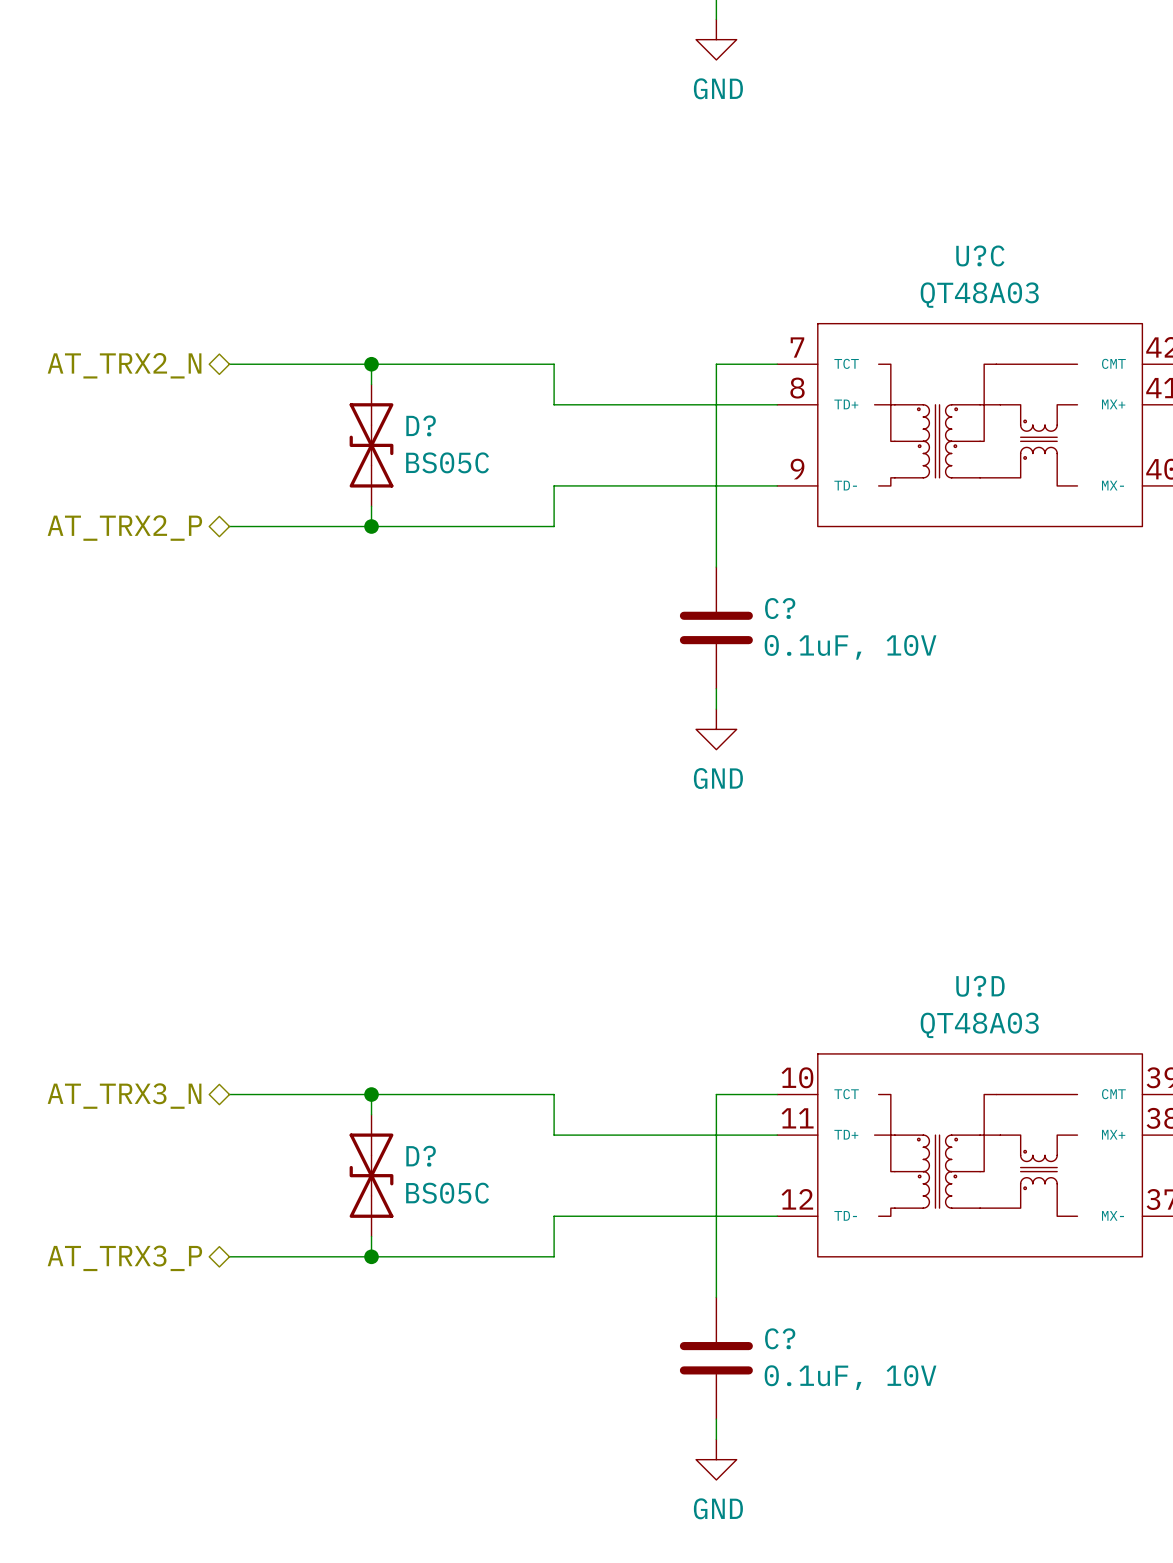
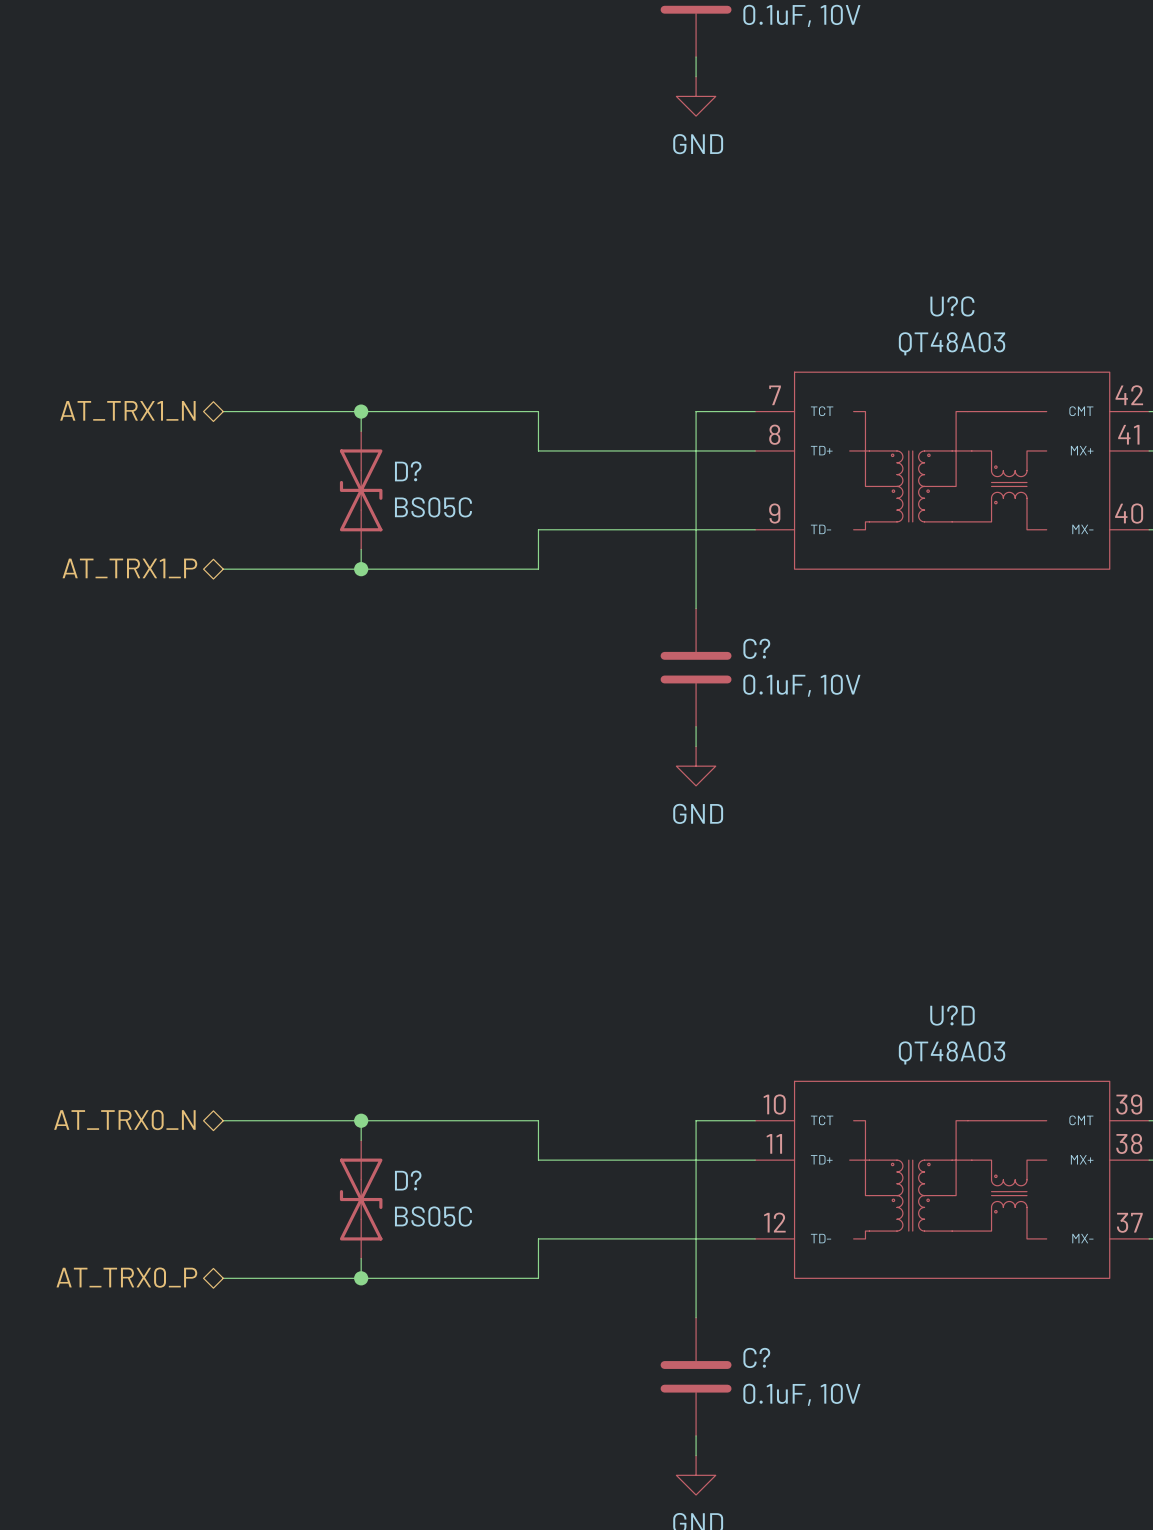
hierarchical label: AT_TRX2_N (124, 365) -> AT_TRX1_N (127, 410)
hierarchical label: AT_TRX2_P (124, 528) -> AT_TRX1_P (129, 568)
hierarchical label: AT_TRX3_N (124, 1096) -> AT_TRX0_N (124, 1120)
hierarchical label: AT_TRX3_P (124, 1258) -> AT_TRX0_P (126, 1277)

